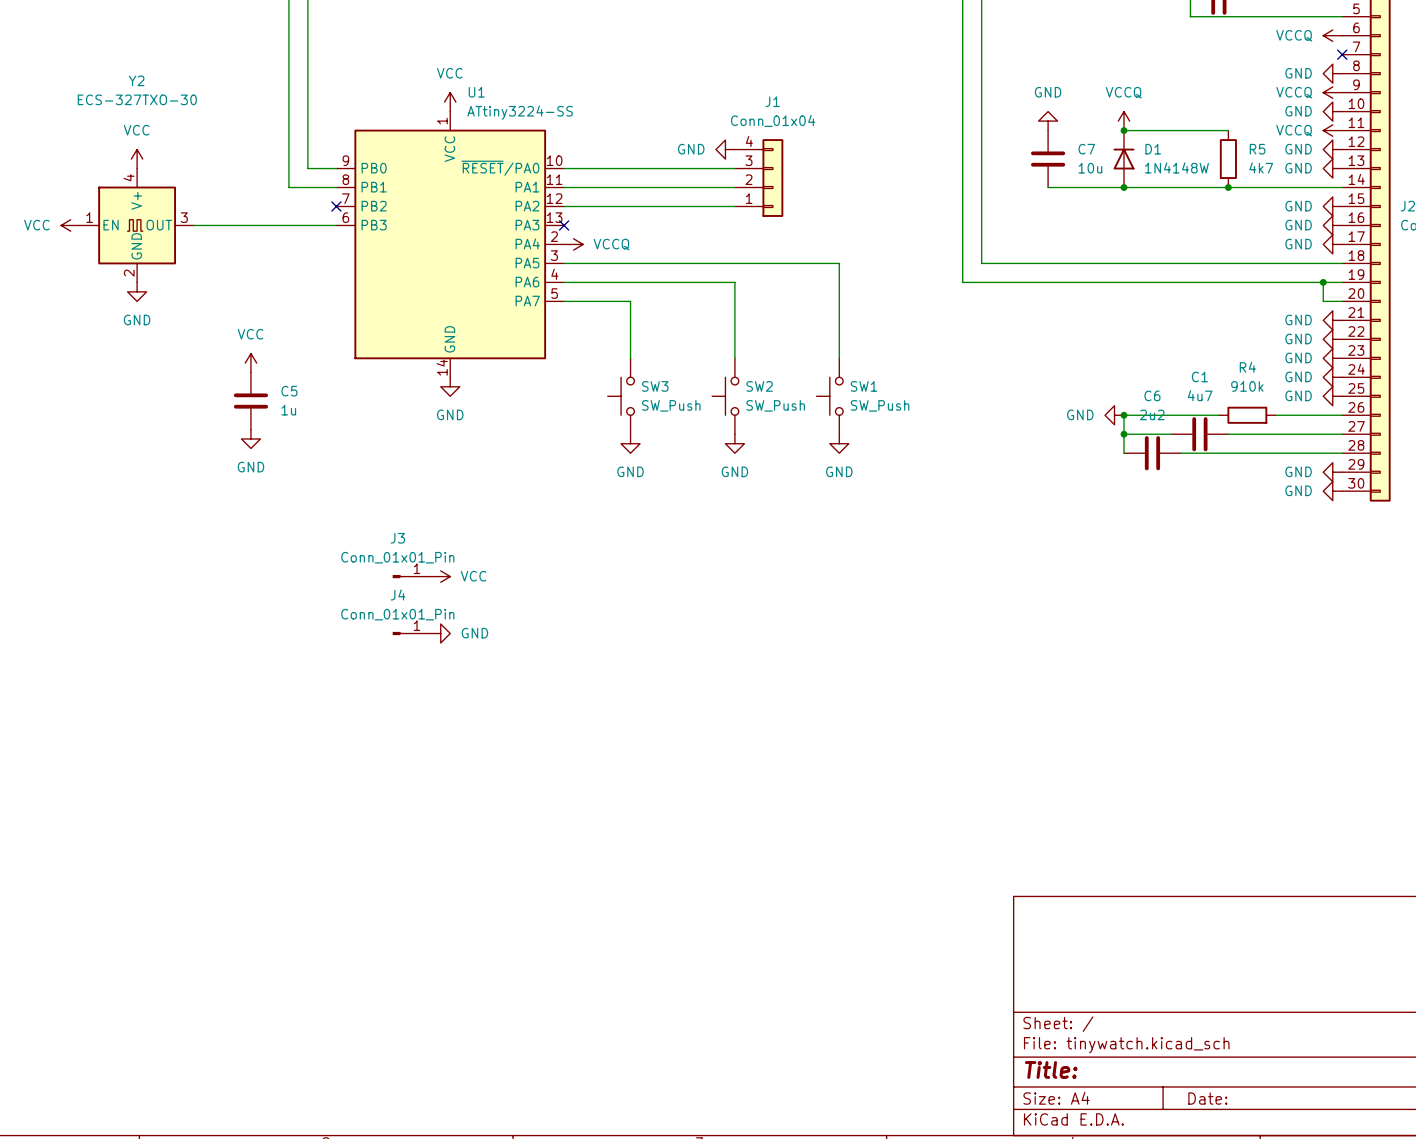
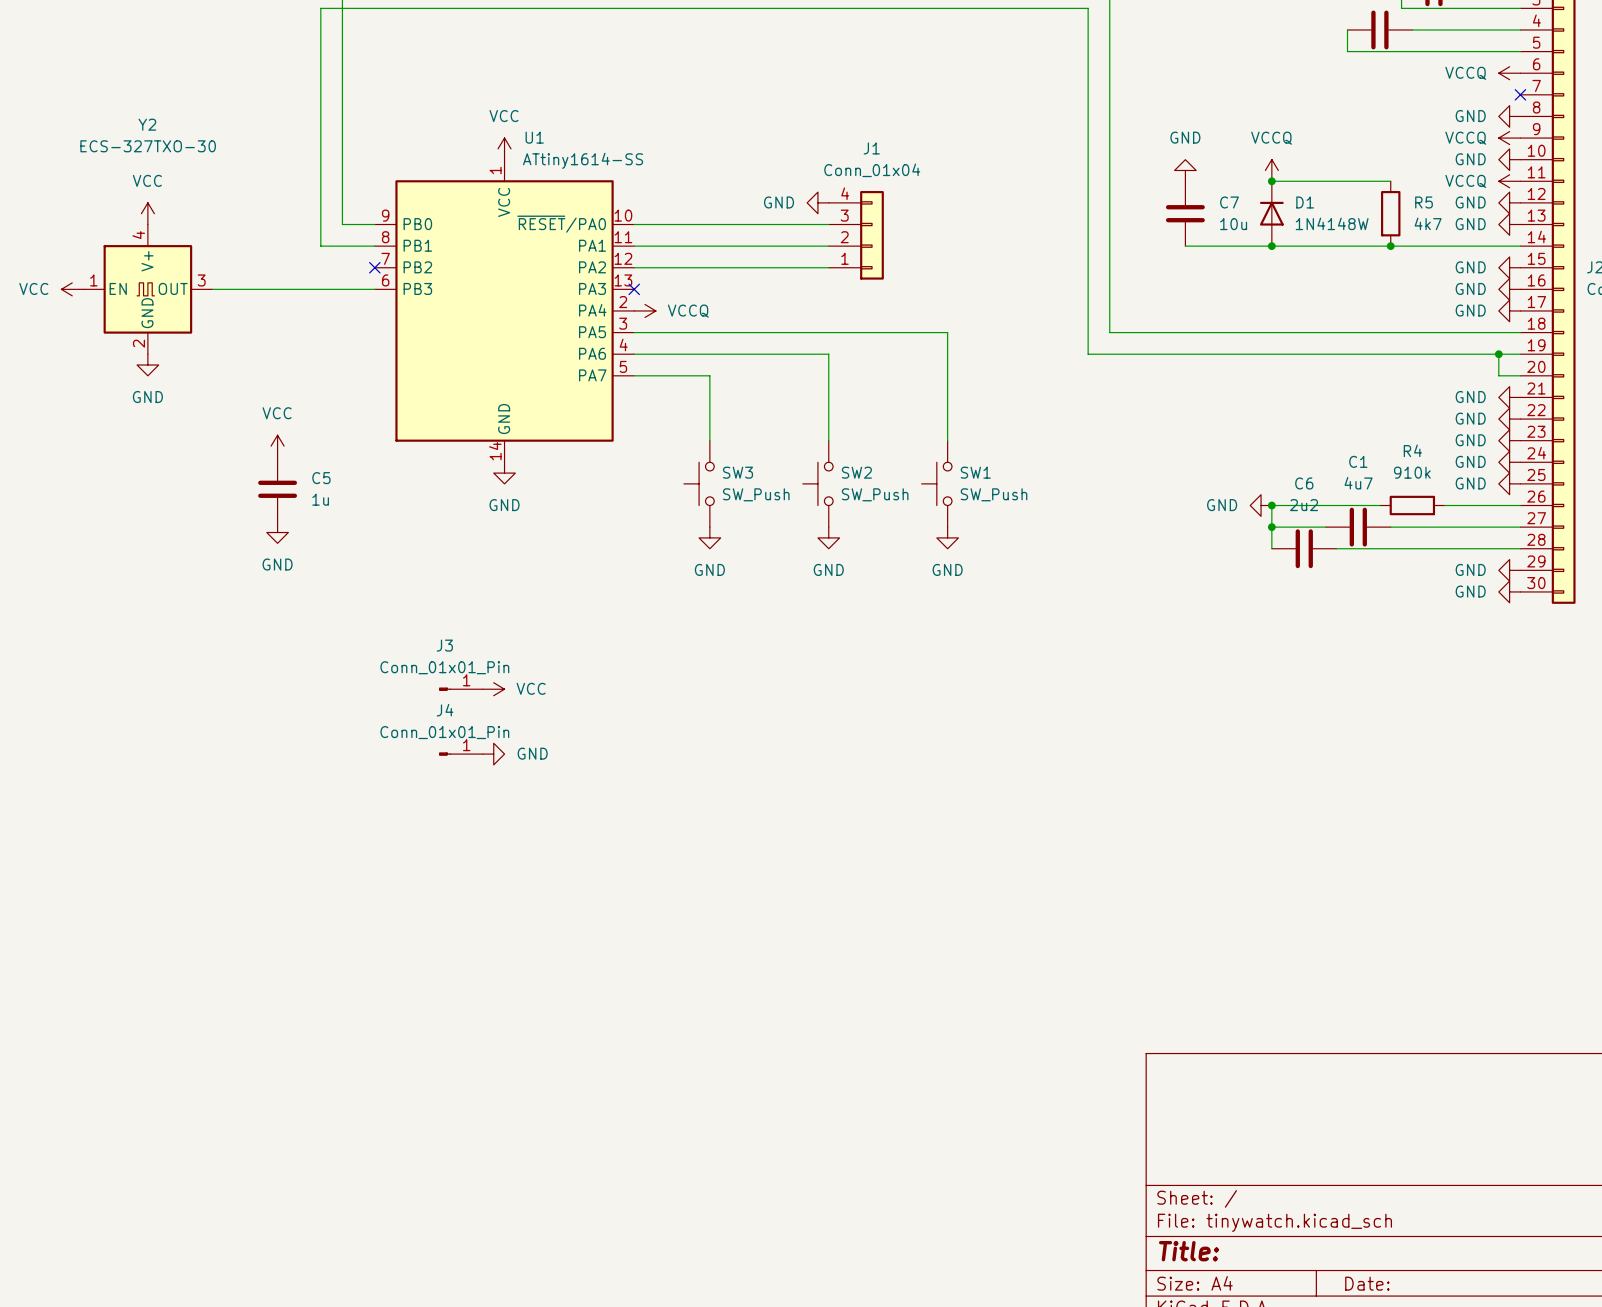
U1 value: ATtiny3224-SS (520, 112) -> ATtiny1614-SS (583, 160)

